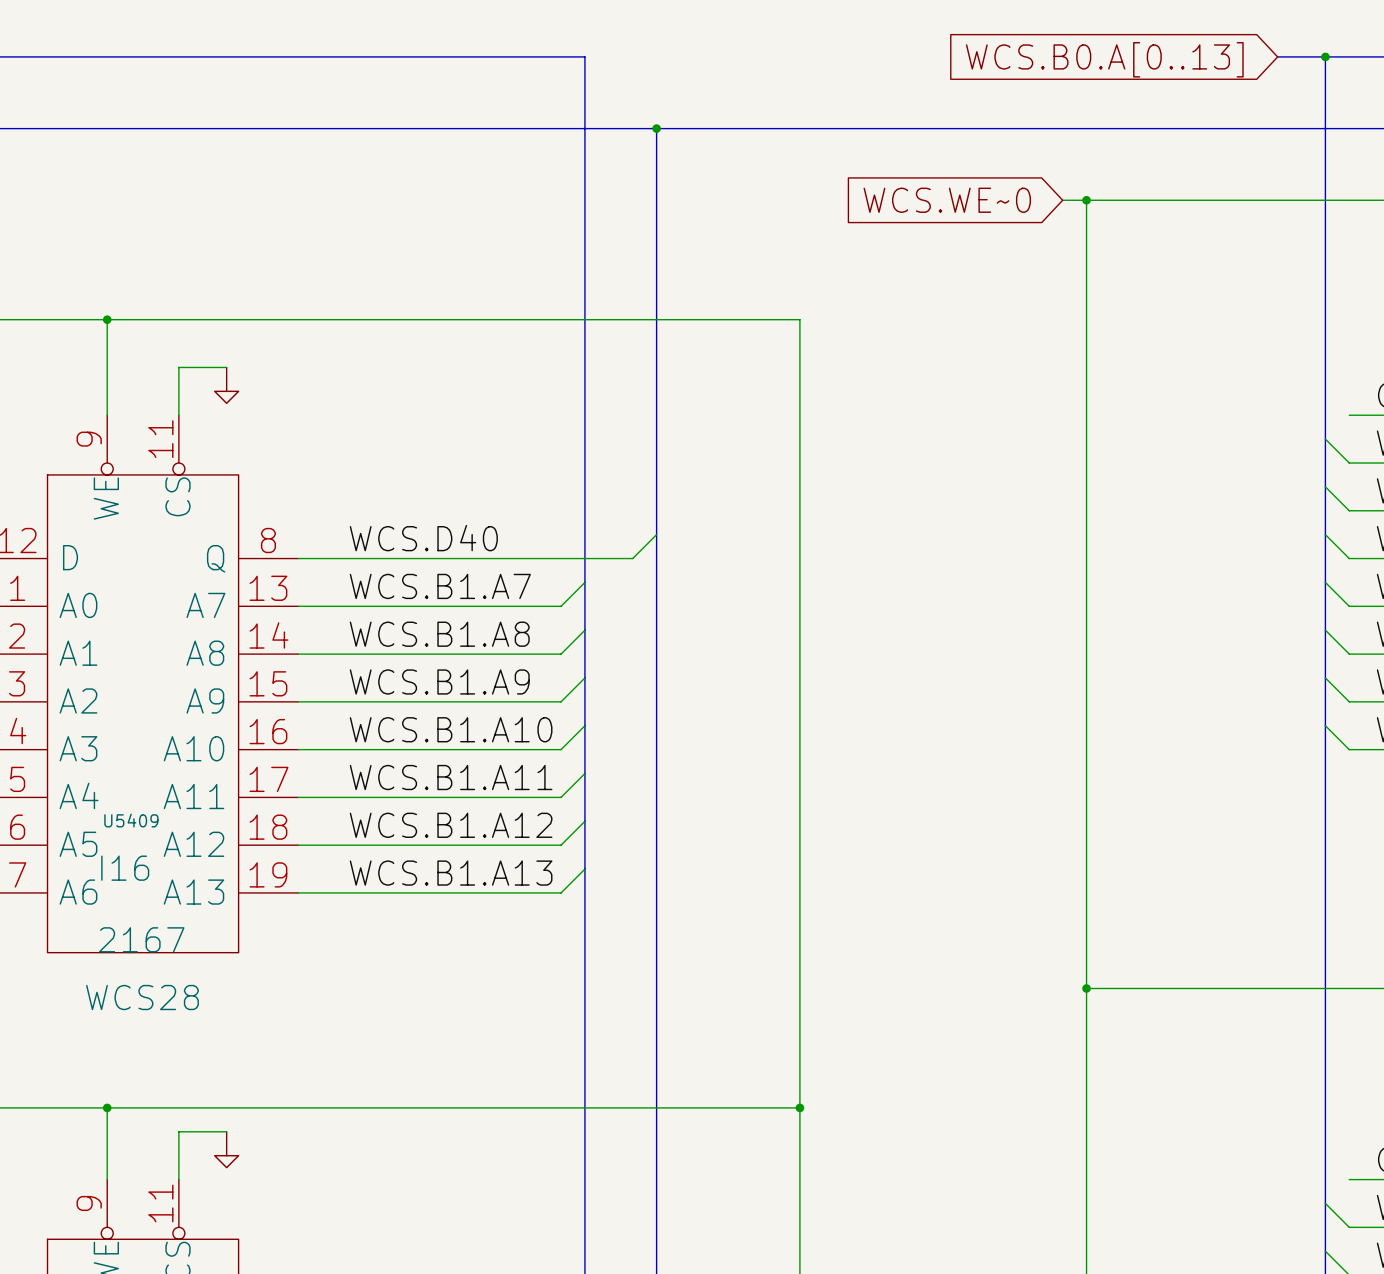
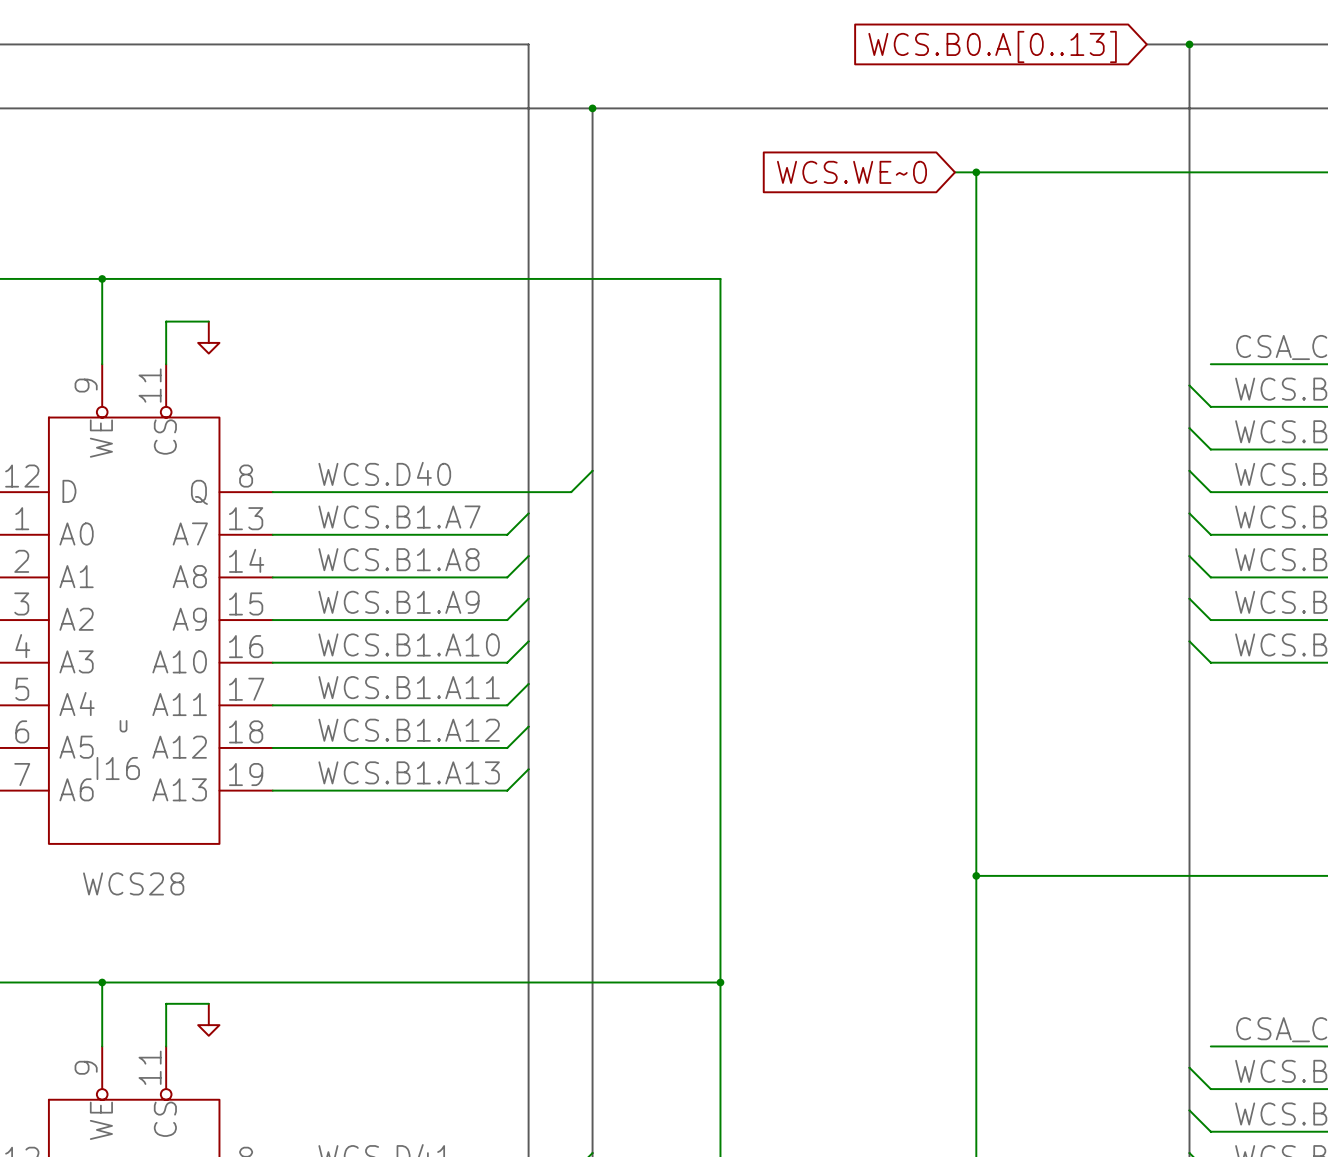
U5409 name: U5409 (131, 820) -> U (123, 726)
U5409 value: 2167 (141, 939) -> none

